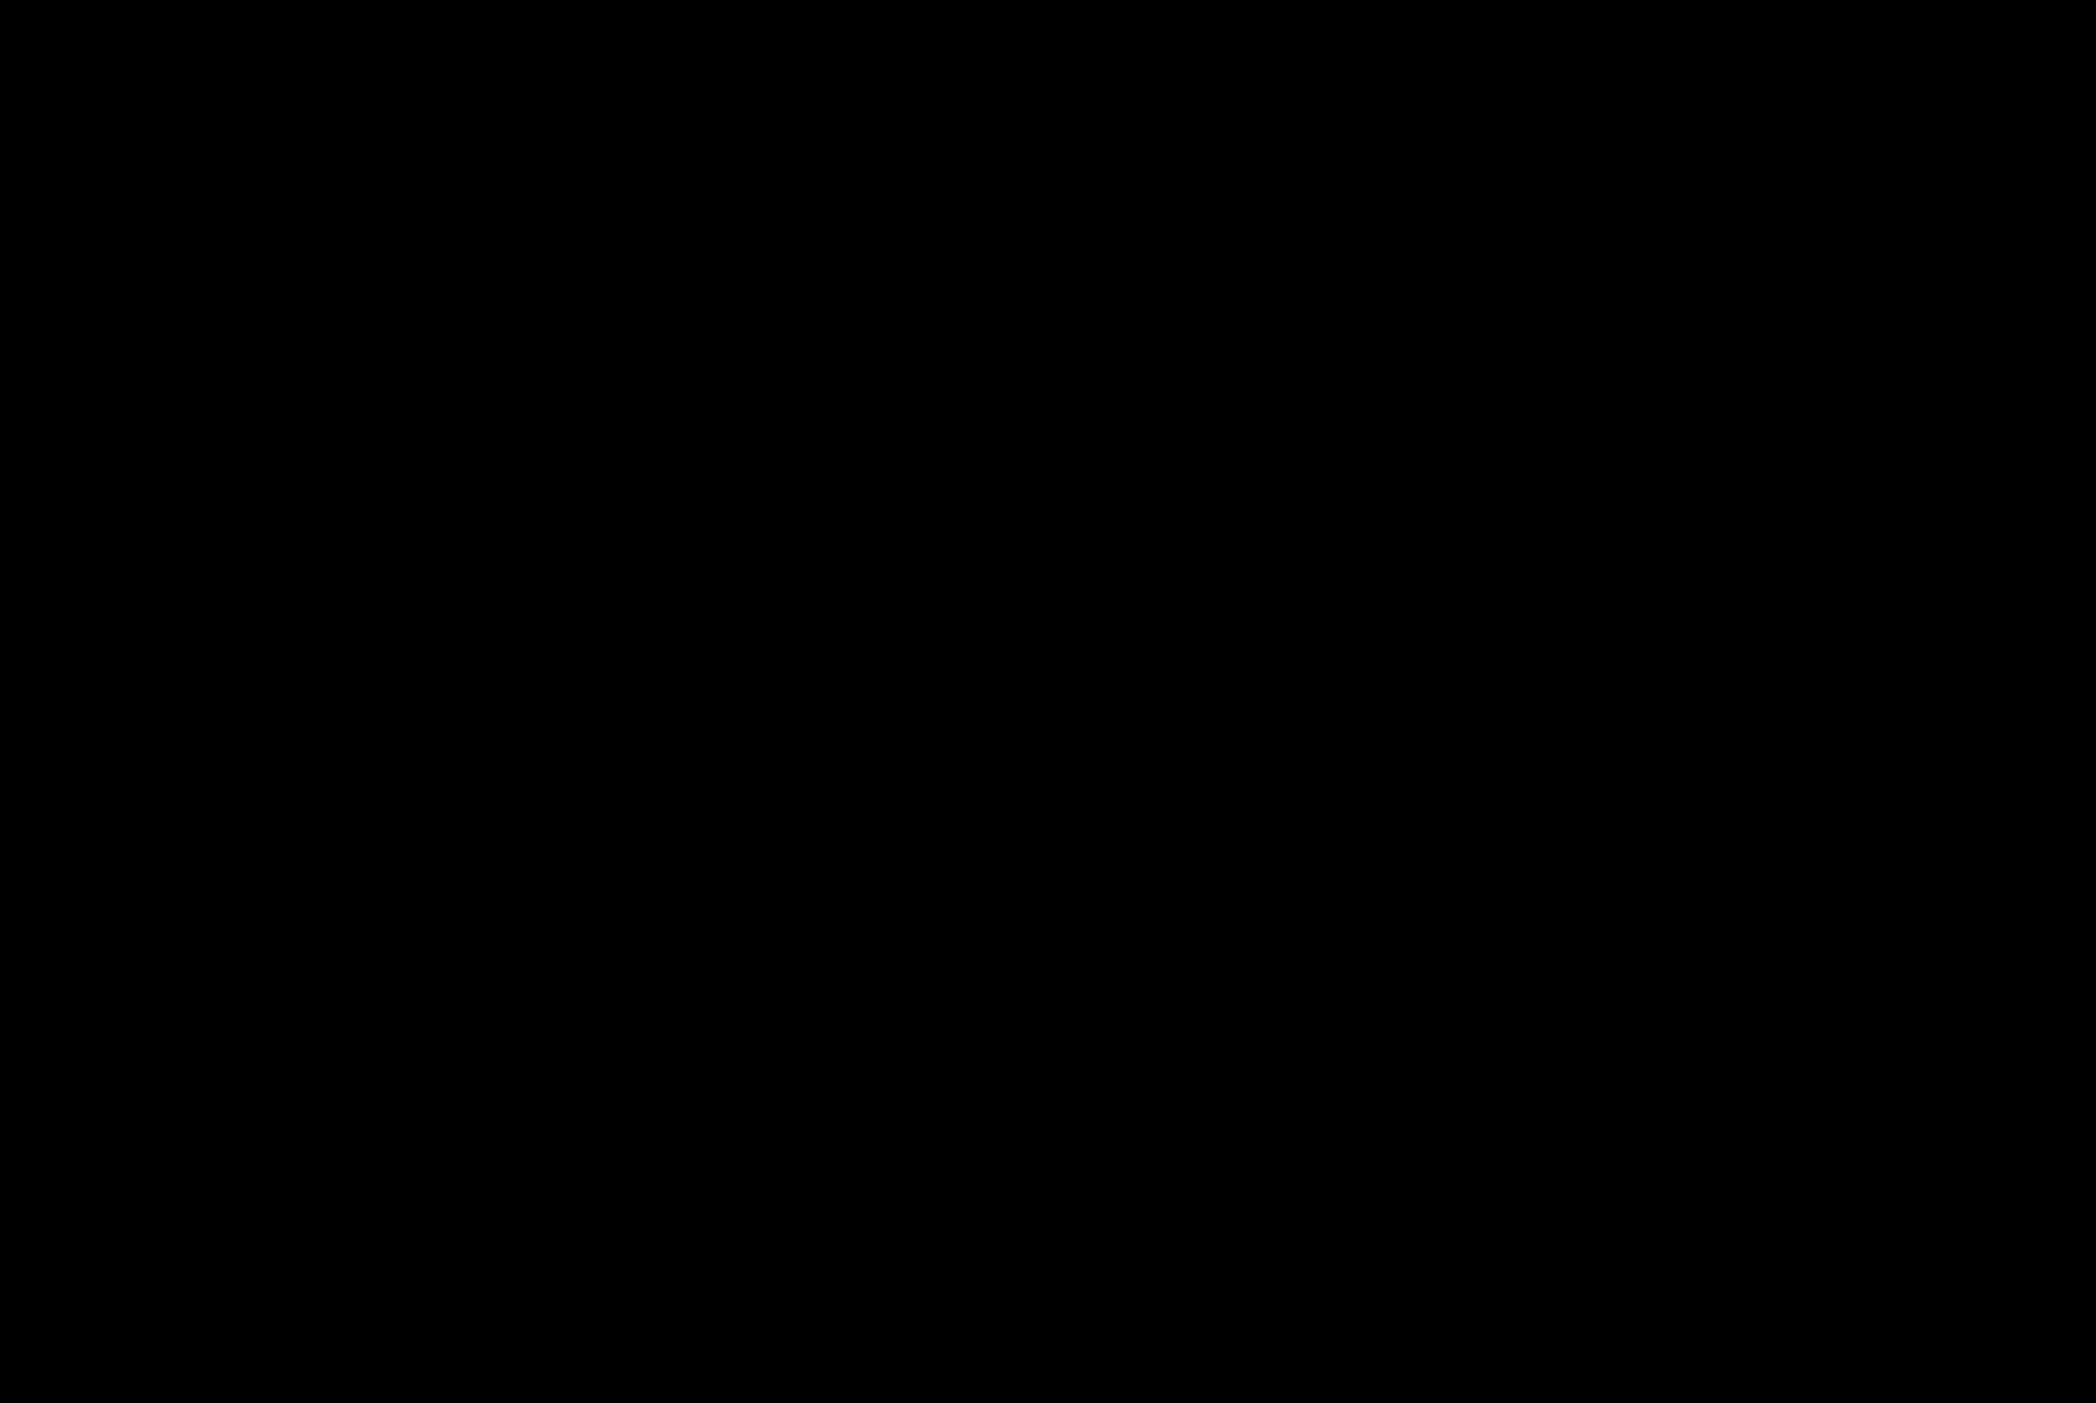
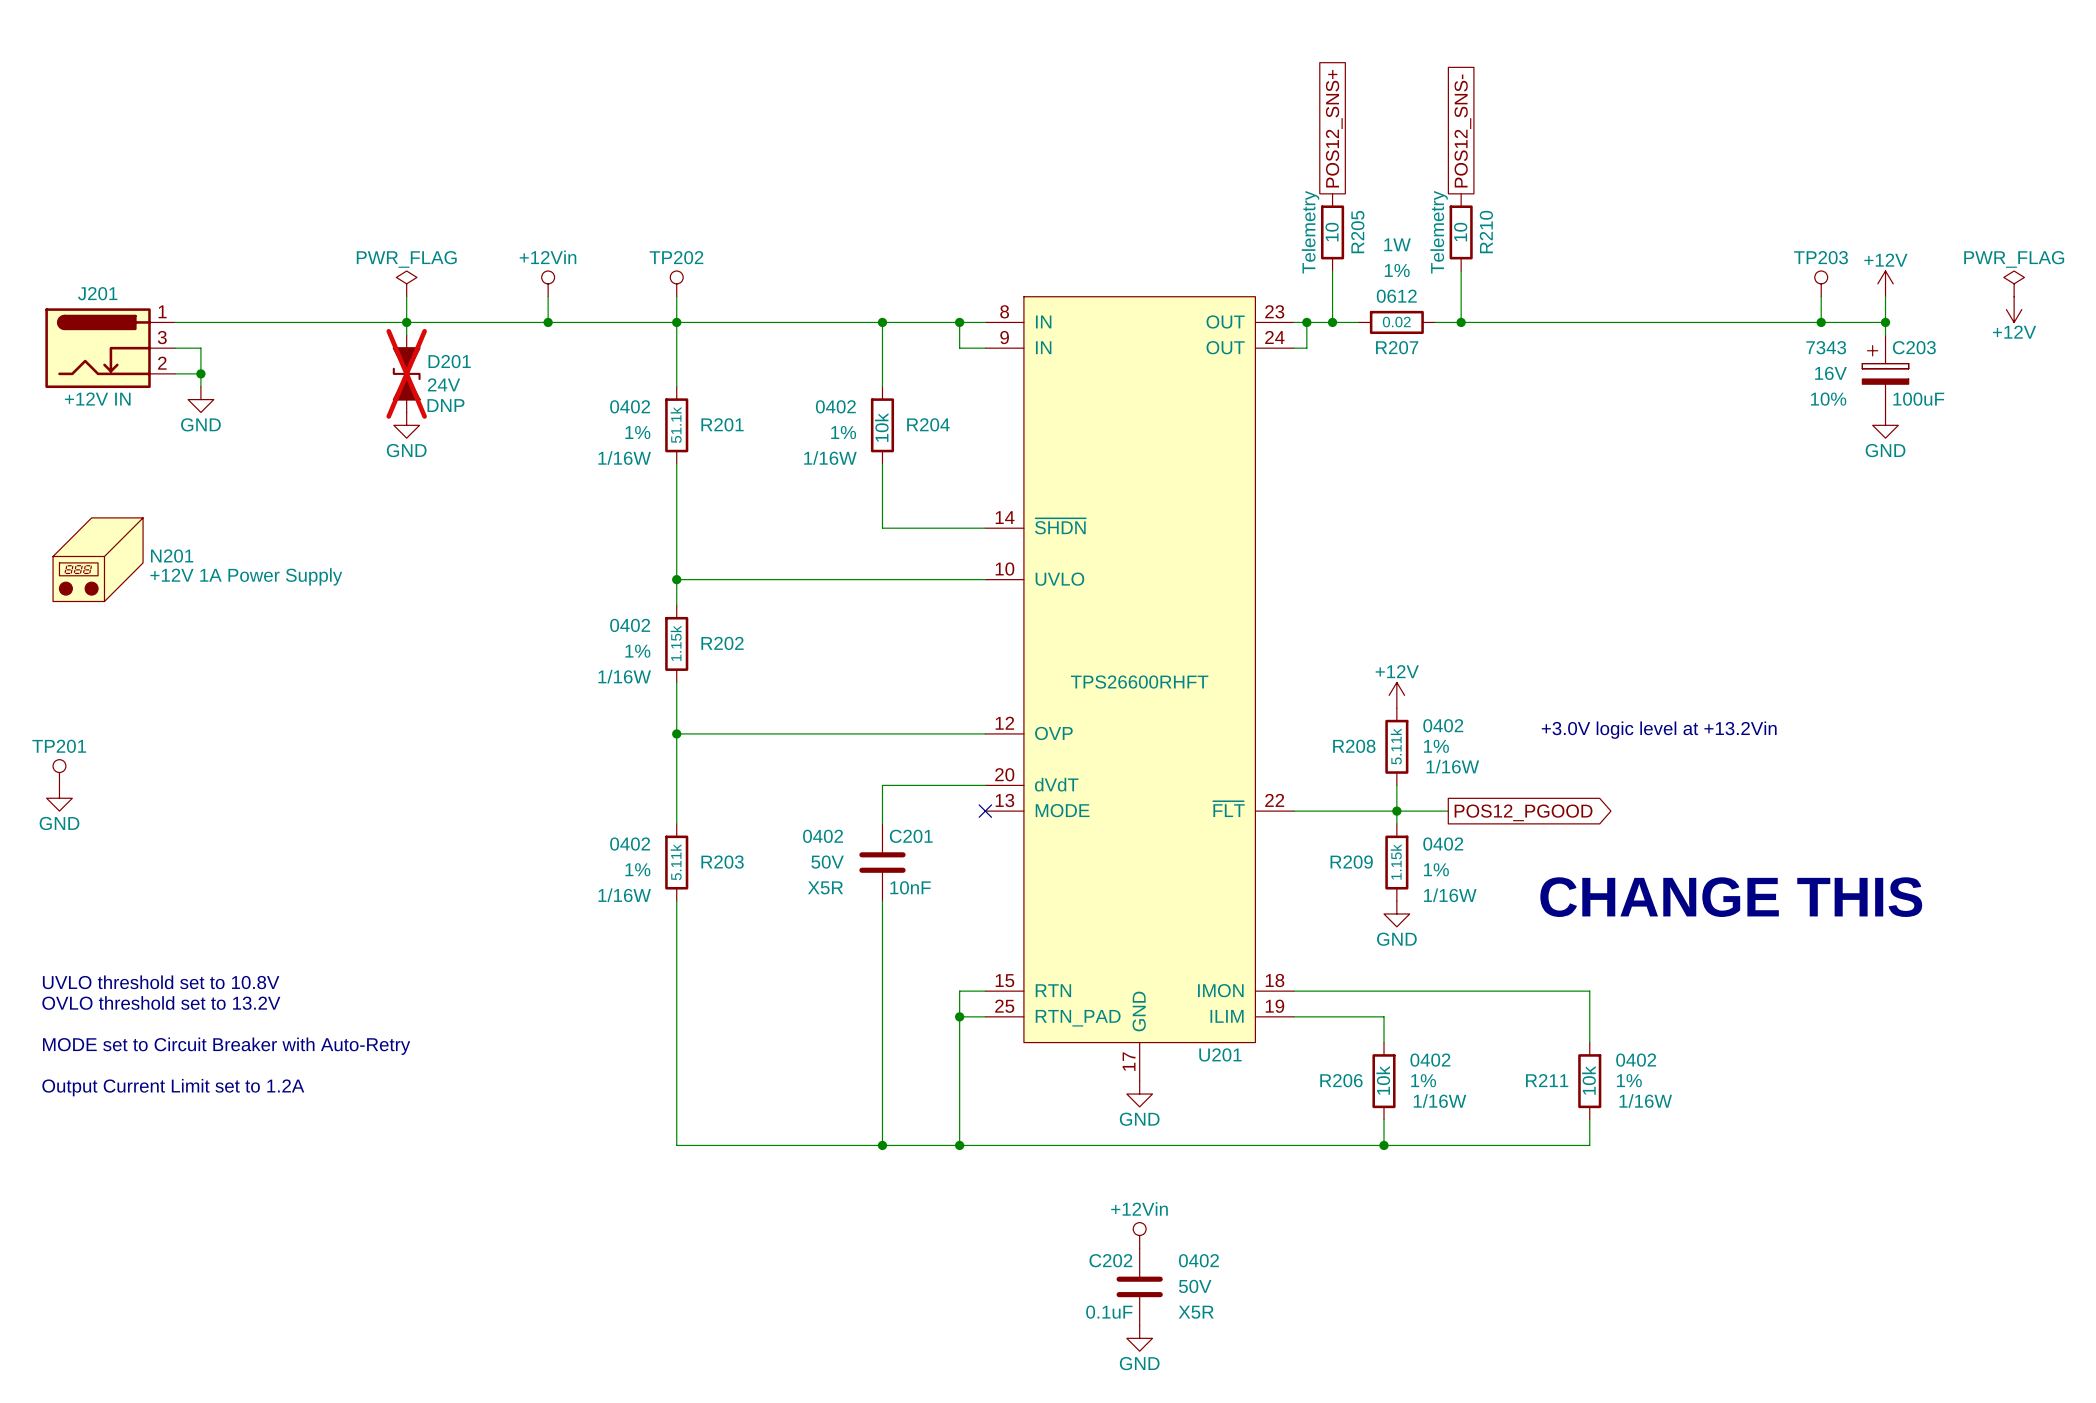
global label: none -> POS12_SNS+ (1334, 128)
global label: none -> POS12_SNS- (1462, 131)
R205: none -> 10 (1332, 232)
R210: none -> 10 (1461, 232)
wire: none -> (1332, 271) (1332, 322)
wire: none -> (1461, 271) (1461, 322)
power symbol: none -> PWR_FLAG (406, 283)
power symbol: none -> +12Vin (548, 283)
TP202: none -> (676, 283)
TP203: none -> (1821, 283)
power symbol: none -> +12V (1885, 283)
power symbol: none -> PWR_FLAG (2014, 283)
wire: none -> (406, 296) (406, 335)
wire: none -> (548, 296) (548, 322)
wire: none -> (676, 296) (676, 386)
wire: none -> (1821, 296) (1821, 322)
wire: none -> (1885, 296) (1885, 335)
power symbol: none -> +12V (2014, 309)
wire: none -> (175, 322) (985, 322)
junction: none -> (406, 322)
junction: none -> (548, 322)
junction: none -> (676, 322)
wire: none -> (882, 322) (882, 386)
junction: none -> (882, 322)
wire: none -> (959, 322) (959, 348) (985, 348)
junction: none -> (959, 322)
wire: none -> (1293, 322) (1358, 322)
wire: none -> (1306, 322) (1306, 348) (1293, 348)
junction: none -> (1306, 322)
junction: none -> (1332, 322)
R207: none -> 0.02 (1396, 322)
wire: none -> (1435, 322) (1885, 322)
junction: none -> (1461, 322)
junction: none -> (1821, 322)
junction: none -> (1885, 322)
J201: none -> +12V IN (110, 348)
wire: none -> (175, 348) (200, 348) (200, 386)
wire: none -> (175, 373) (200, 373)
junction: none -> (200, 373)
D201: none -> 24V (406, 373)
C203: none -> 100uF (1885, 373)
power symbol: none -> GND (200, 399)
power symbol: none -> GND (406, 425)
R201: none -> 51.1k (676, 425)
R204: none -> 10k (882, 425)
power symbol: none -> GND (1885, 425)
wire: none -> (676, 463) (676, 605)
wire: none -> (882, 463) (882, 528) (985, 528)
N201: none -> +12V 1A Power Supply (98, 559)
wire: none -> (676, 579) (985, 579)
junction: none -> (676, 579)
R202: none -> 1.15k (676, 643)
wire: none -> (676, 682) (676, 823)
U201: none -> TPS26600RHFT (1139, 688)
power symbol: none -> +12V (1396, 695)
text: none -> +3.0V logic level at +13.2Vin (1659, 730)
wire: none -> (676, 733) (985, 733)
junction: none -> (676, 733)
R208: none -> 5.11k (1396, 746)
TP201: none -> (59, 772)
wire: none -> (985, 785) (882, 785) (882, 823)
wire: none -> (1396, 785) (1396, 823)
power symbol: none -> GND (59, 798)
no-connect mark: none -> (985, 811)
wire: none -> (1293, 811) (1448, 811)
junction: none -> (1396, 811)
global label: none -> POS12_PGOOD (1523, 812)
R203: none -> 5.11k (676, 862)
C201: none -> 10nF (882, 862)
R209: none -> 1.15k (1396, 862)
text: none -> CHANGE THIS (1731, 897)
wire: none -> (676, 901) (676, 1145) (1589, 1145) (1589, 1119)
wire: none -> (882, 901) (882, 1145)
power symbol: none -> GND (1396, 913)
text: none -> UVLO threshold set to 10.8V (161, 982)
wire: none -> (985, 991) (959, 991) (959, 1145)
wire: none -> (1293, 991) (1589, 991) (1589, 1042)
text: none -> OVLO threshold set to 13.2V (161, 1002)
wire: none -> (959, 1016) (985, 1016)
junction: none -> (959, 1016)
wire: none -> (1293, 1016) (1383, 1016) (1383, 1042)
text: none -> MODE set to Circuit Breaker with Auto-Retry (226, 1046)
R206: none -> 10k (1383, 1081)
R211: none -> 10k (1589, 1081)
text: none -> Output Current Limit set to 1.2A (173, 1087)
power symbol: none -> GND (1139, 1094)
wire: none -> (1383, 1119) (1383, 1145)
junction: none -> (882, 1145)
junction: none -> (959, 1145)
junction: none -> (1383, 1145)
power symbol: none -> +12Vin (1139, 1235)
C202: none -> 0.1uF (1139, 1286)
power symbol: none -> GND (1139, 1338)

